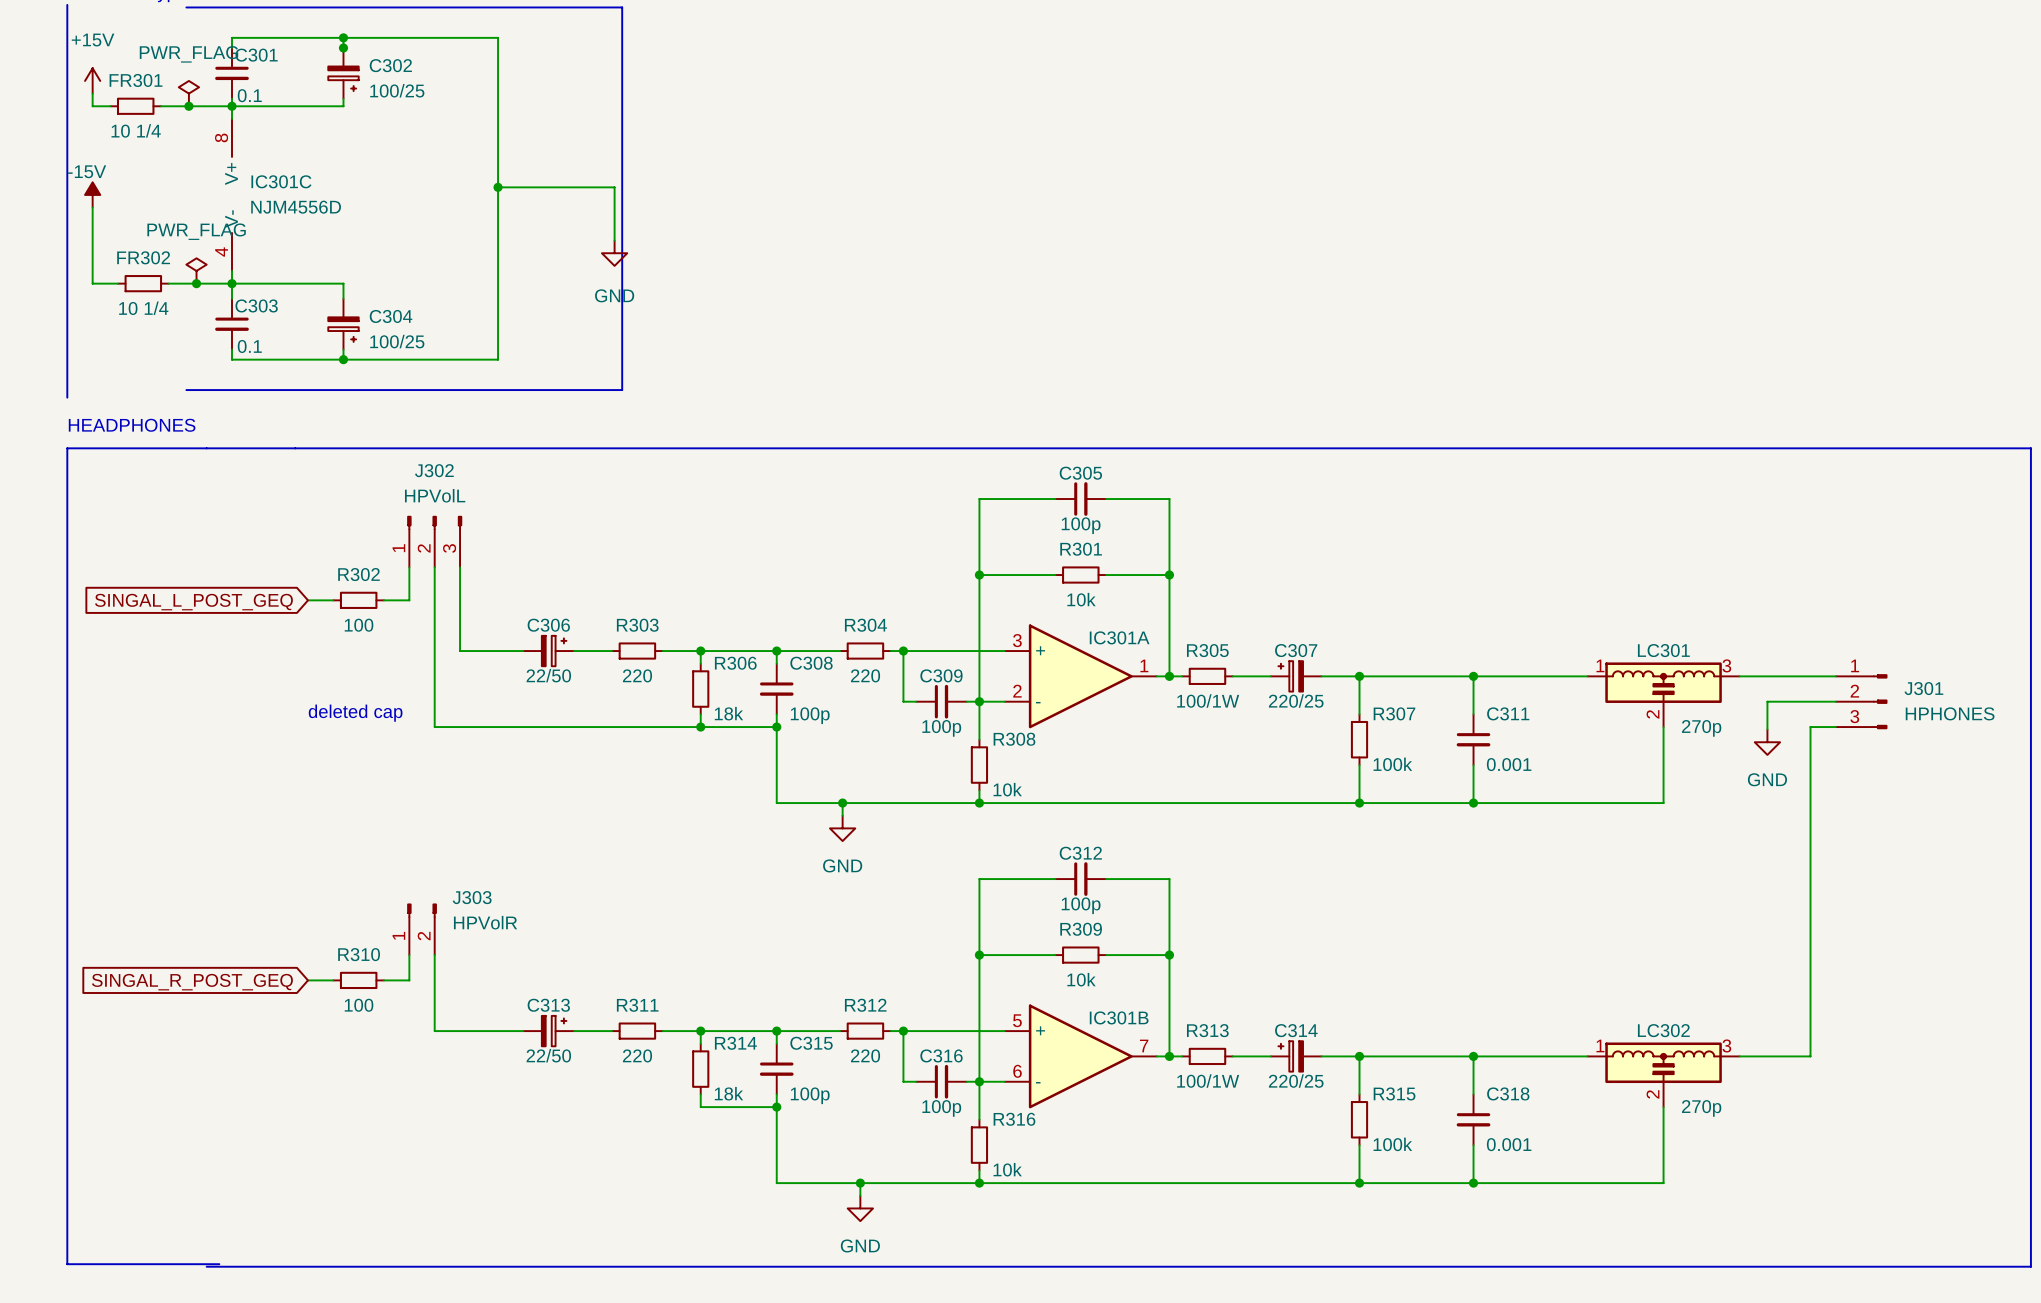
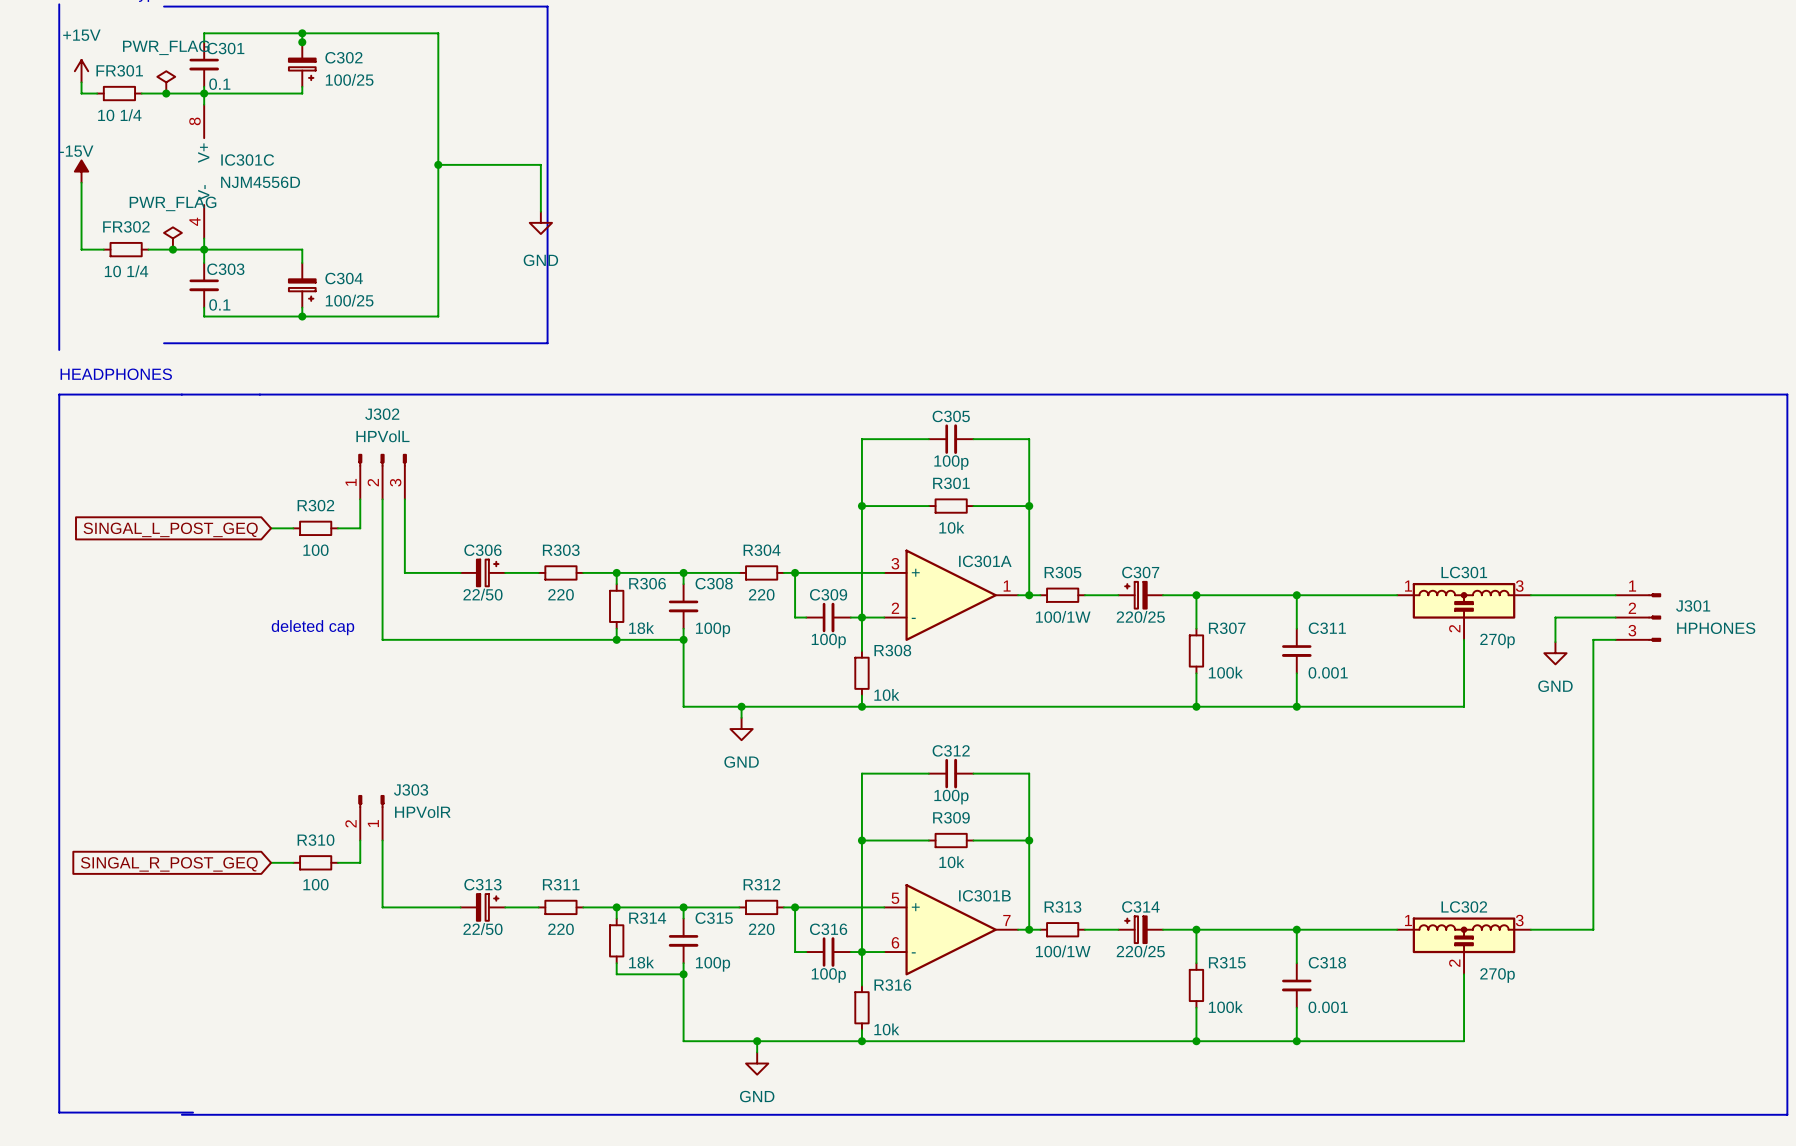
J303 flip: as is (422, 910) -> left-right (371, 801)

